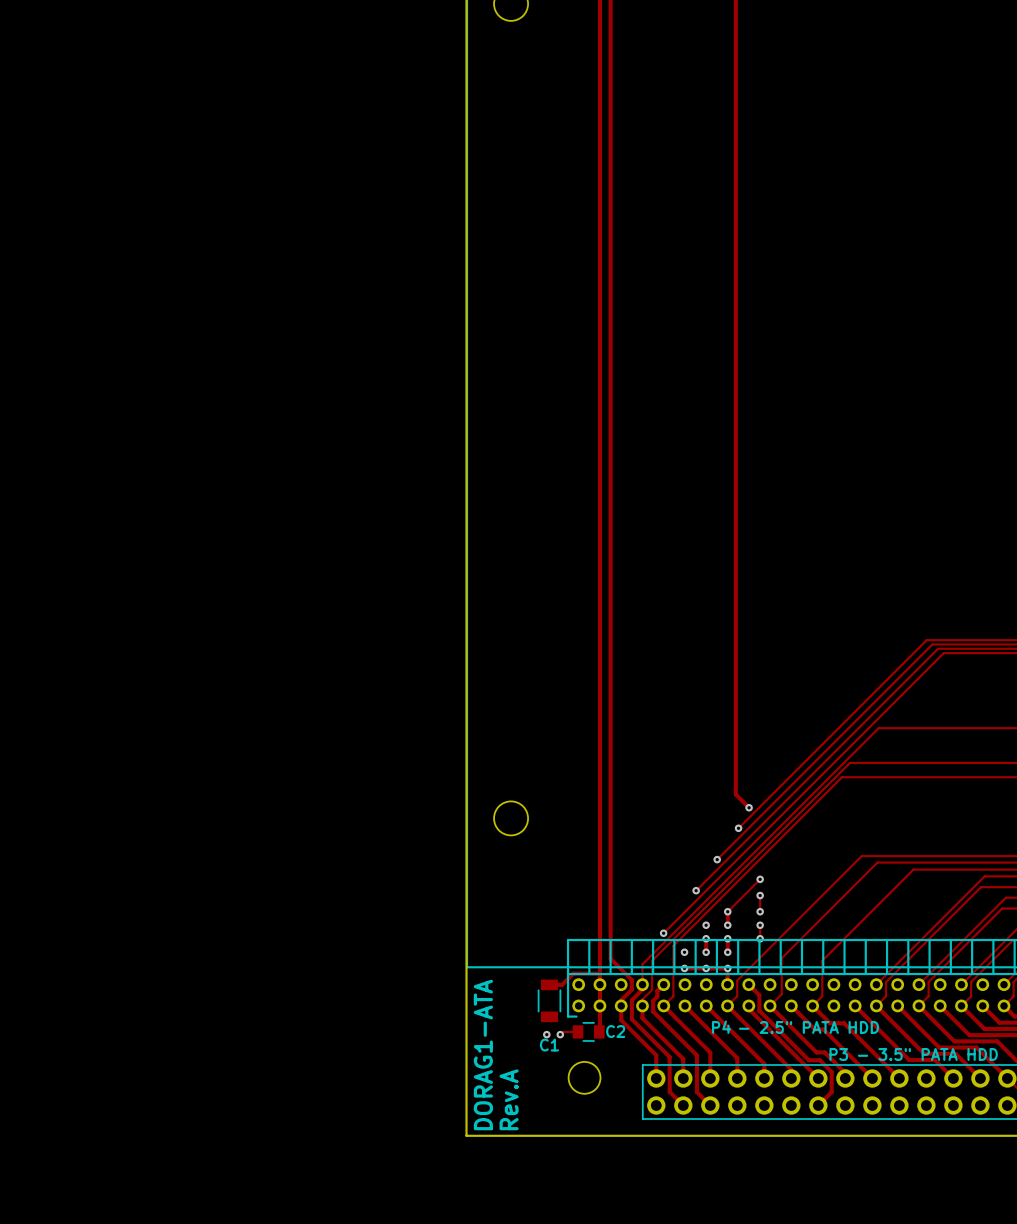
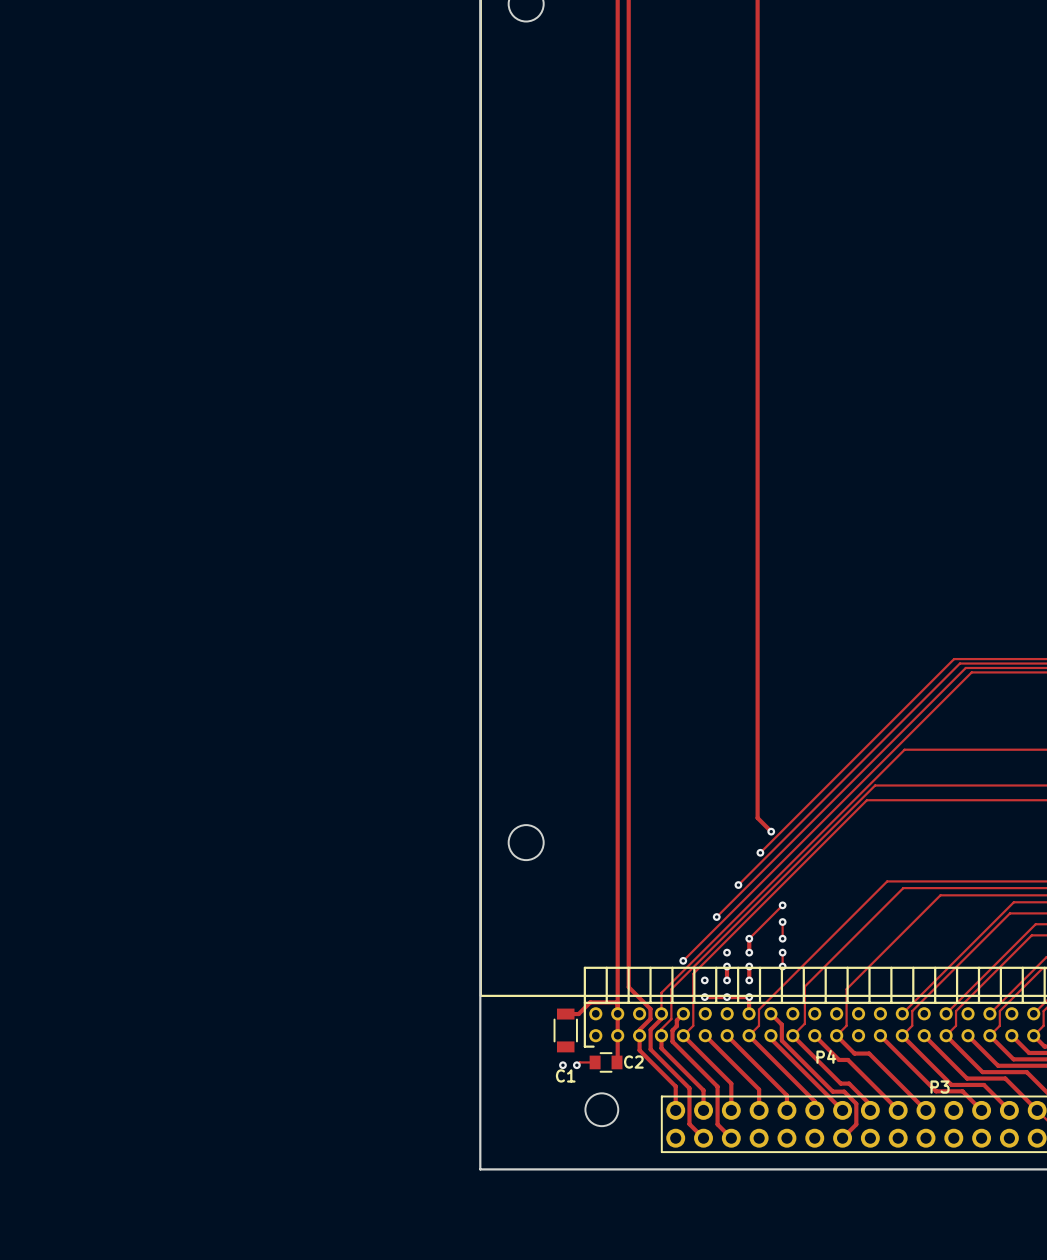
P4 name position: P4 (721, 1027) -> P4 (826, 1056)
text: - 2.5" PATA HDD (809, 1027) -> none
text: DORAG1-ATA (483, 1054) -> none
P3 name position: P3 (838, 1054) -> P3 (940, 1087)
text: - 3.5" PATA HDD (927, 1054) -> none
text: Rev.A (509, 1099) -> none

